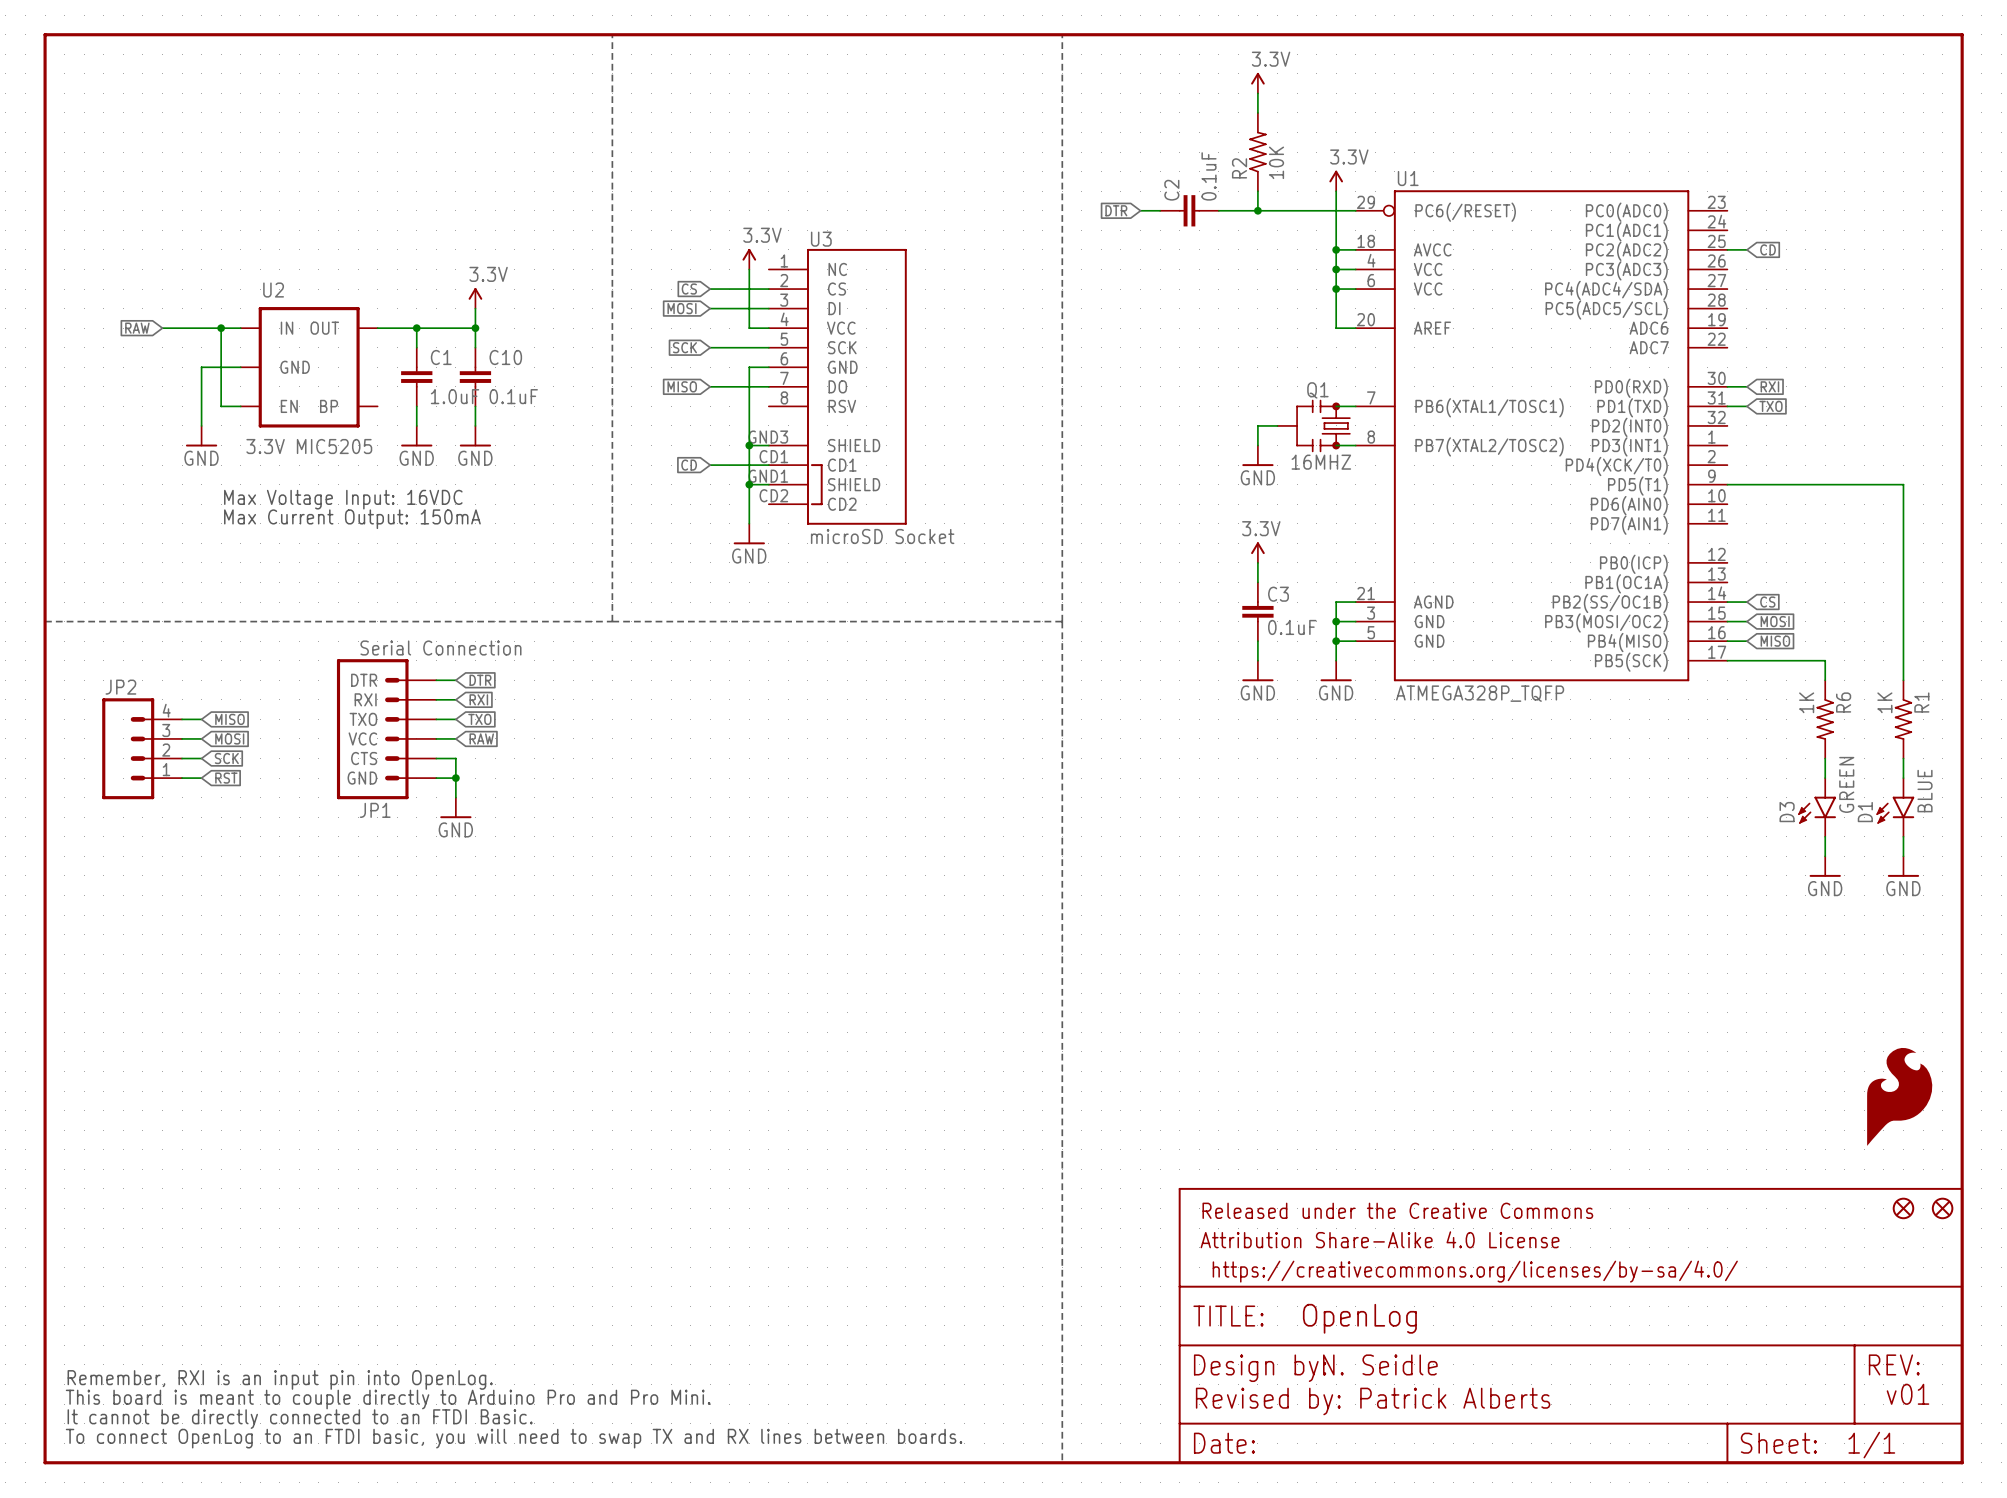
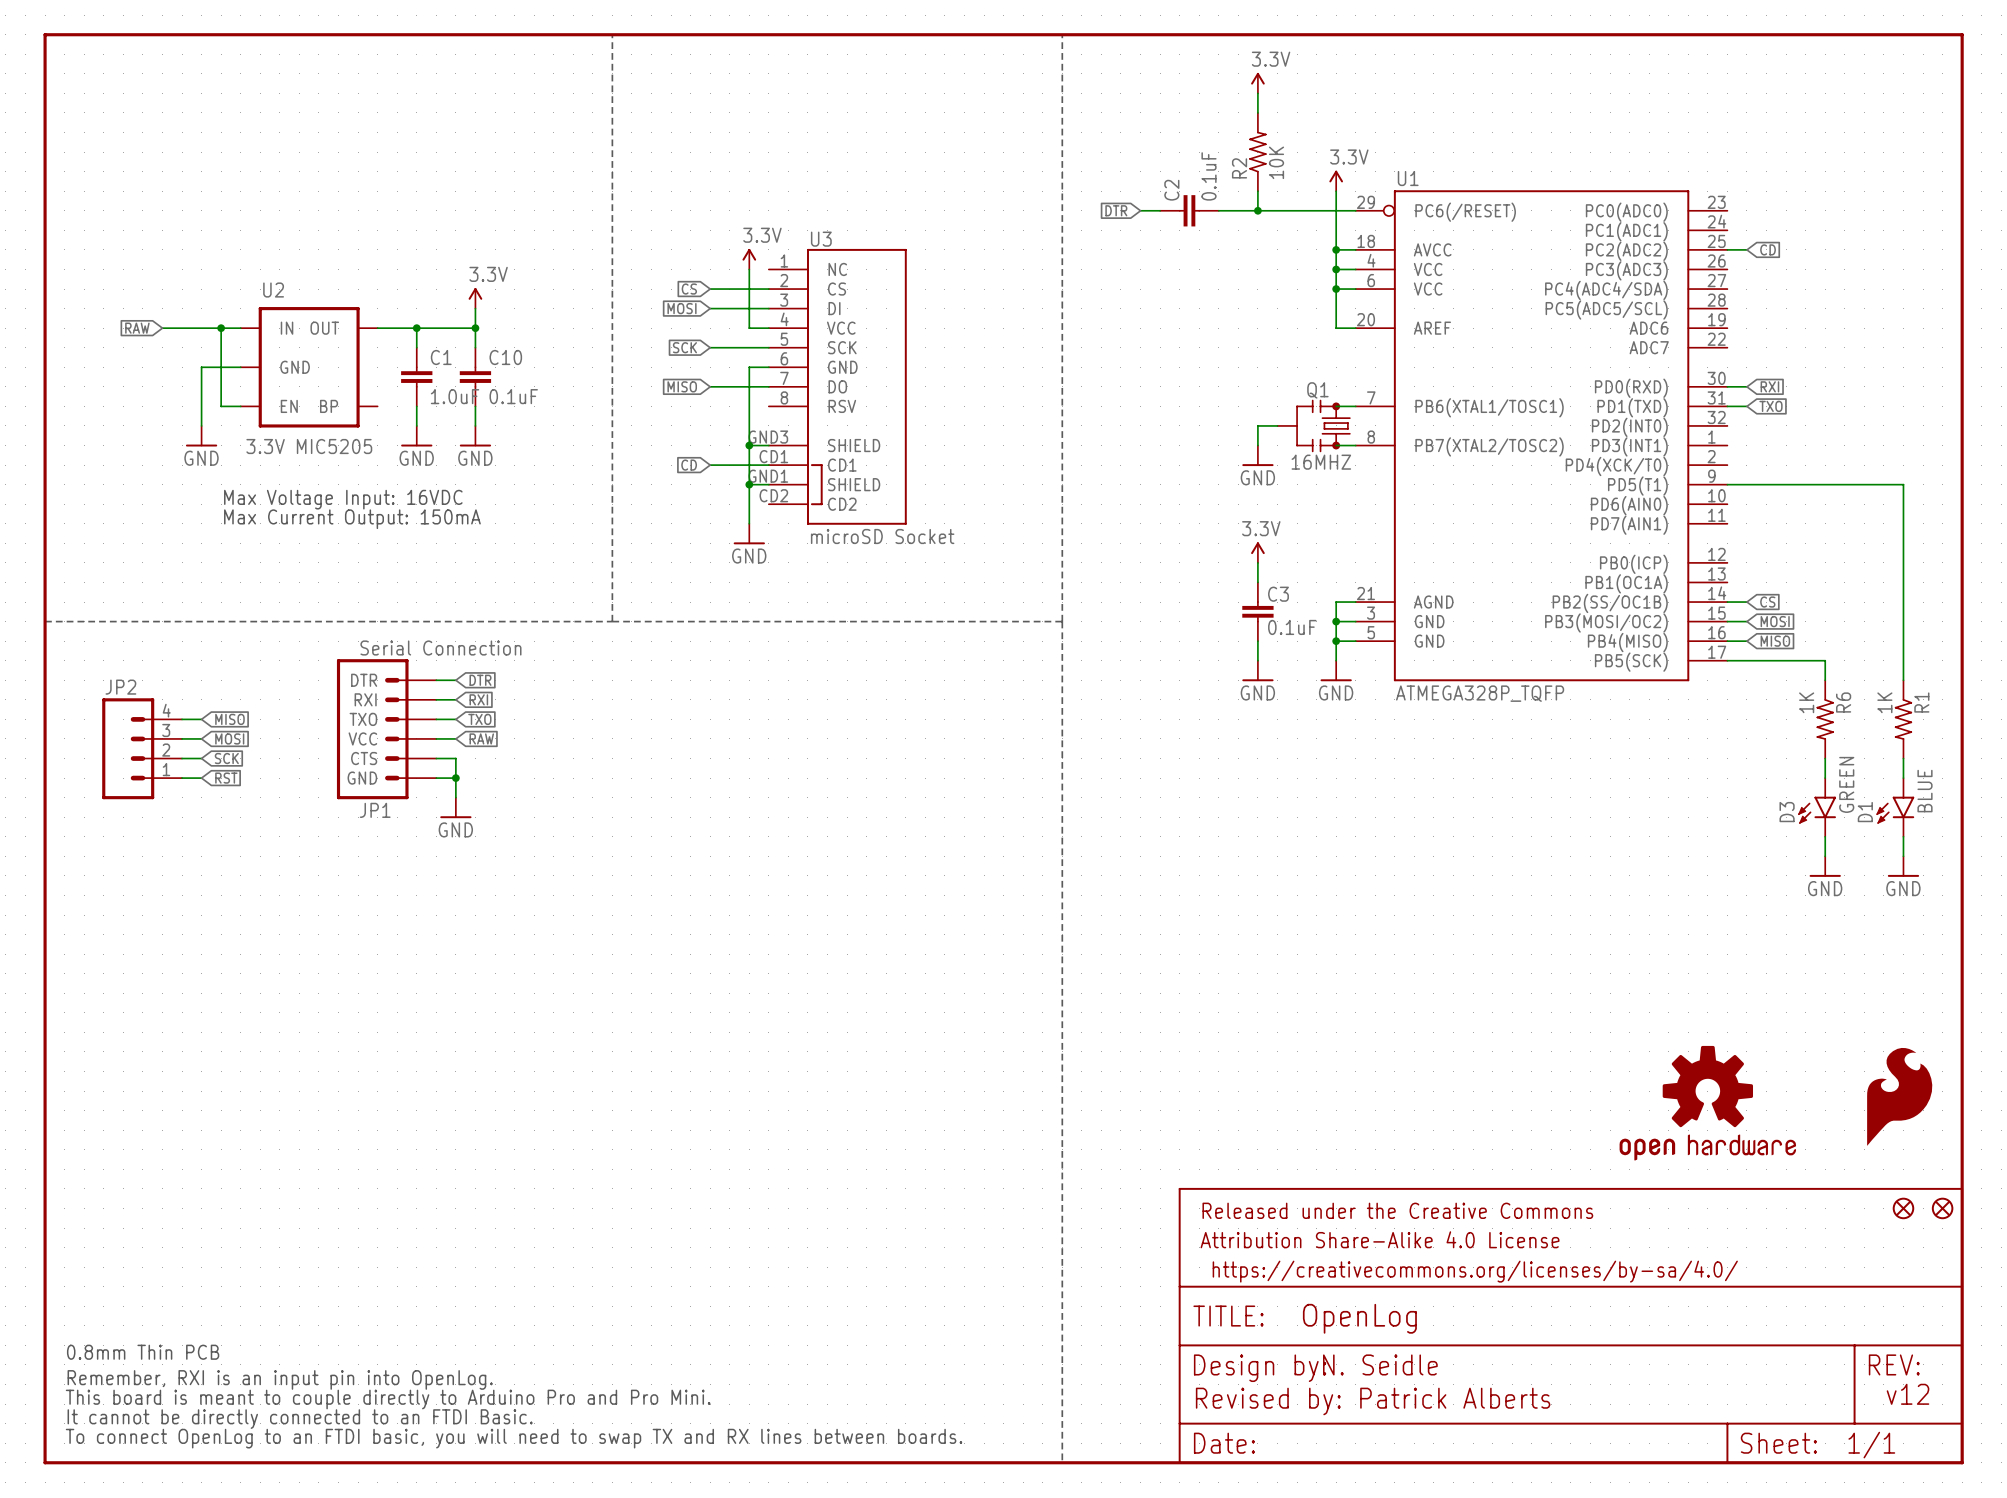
part: none -> (1707, 1103)
text: none -> 0.8mm Thin PCB (143, 1352)
text: v01 (1908, 1394) -> v12 (1908, 1394)

